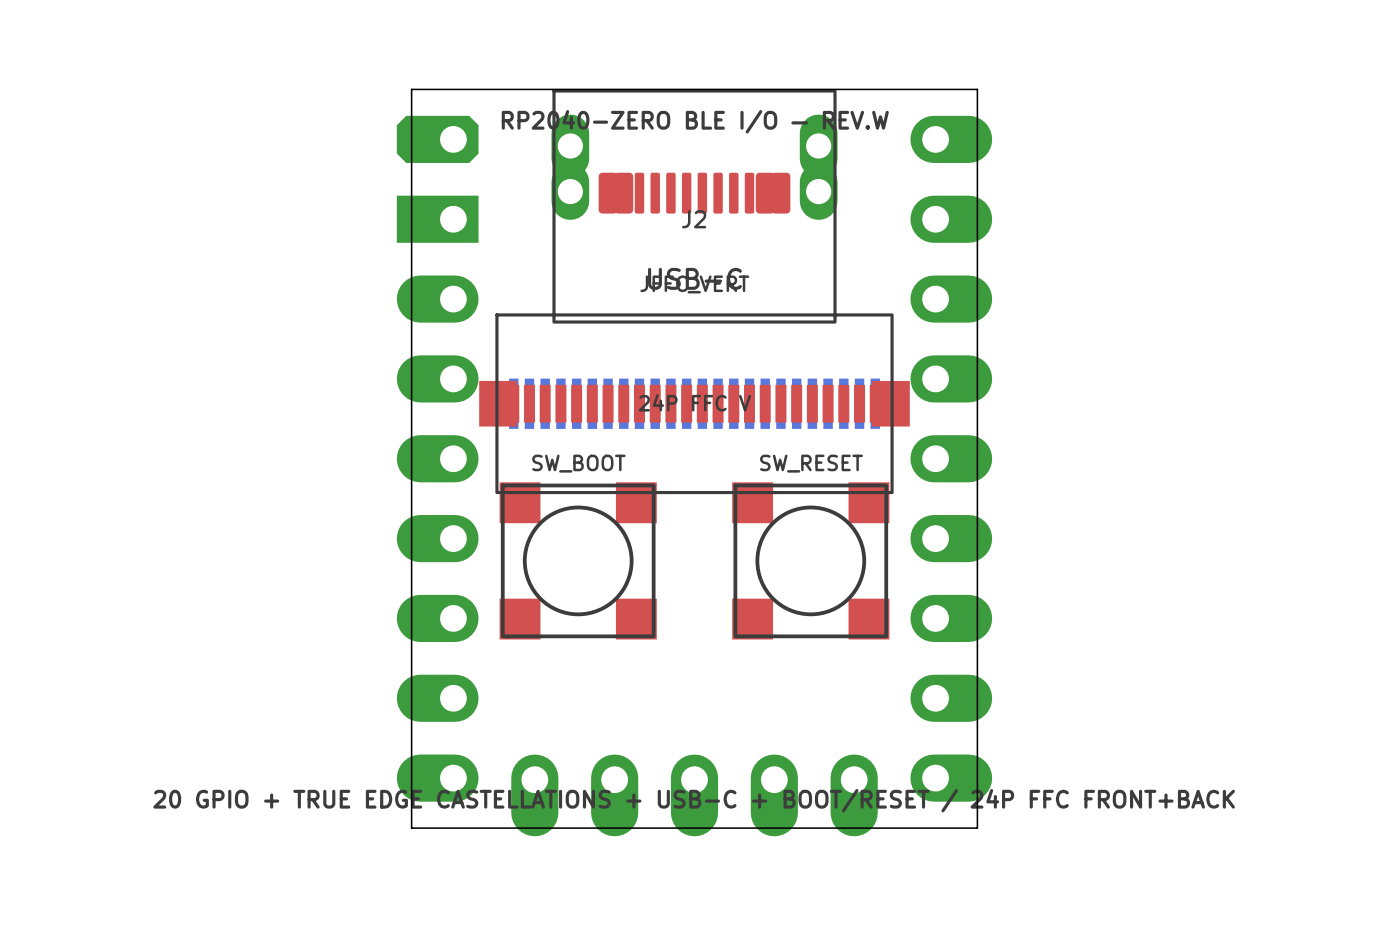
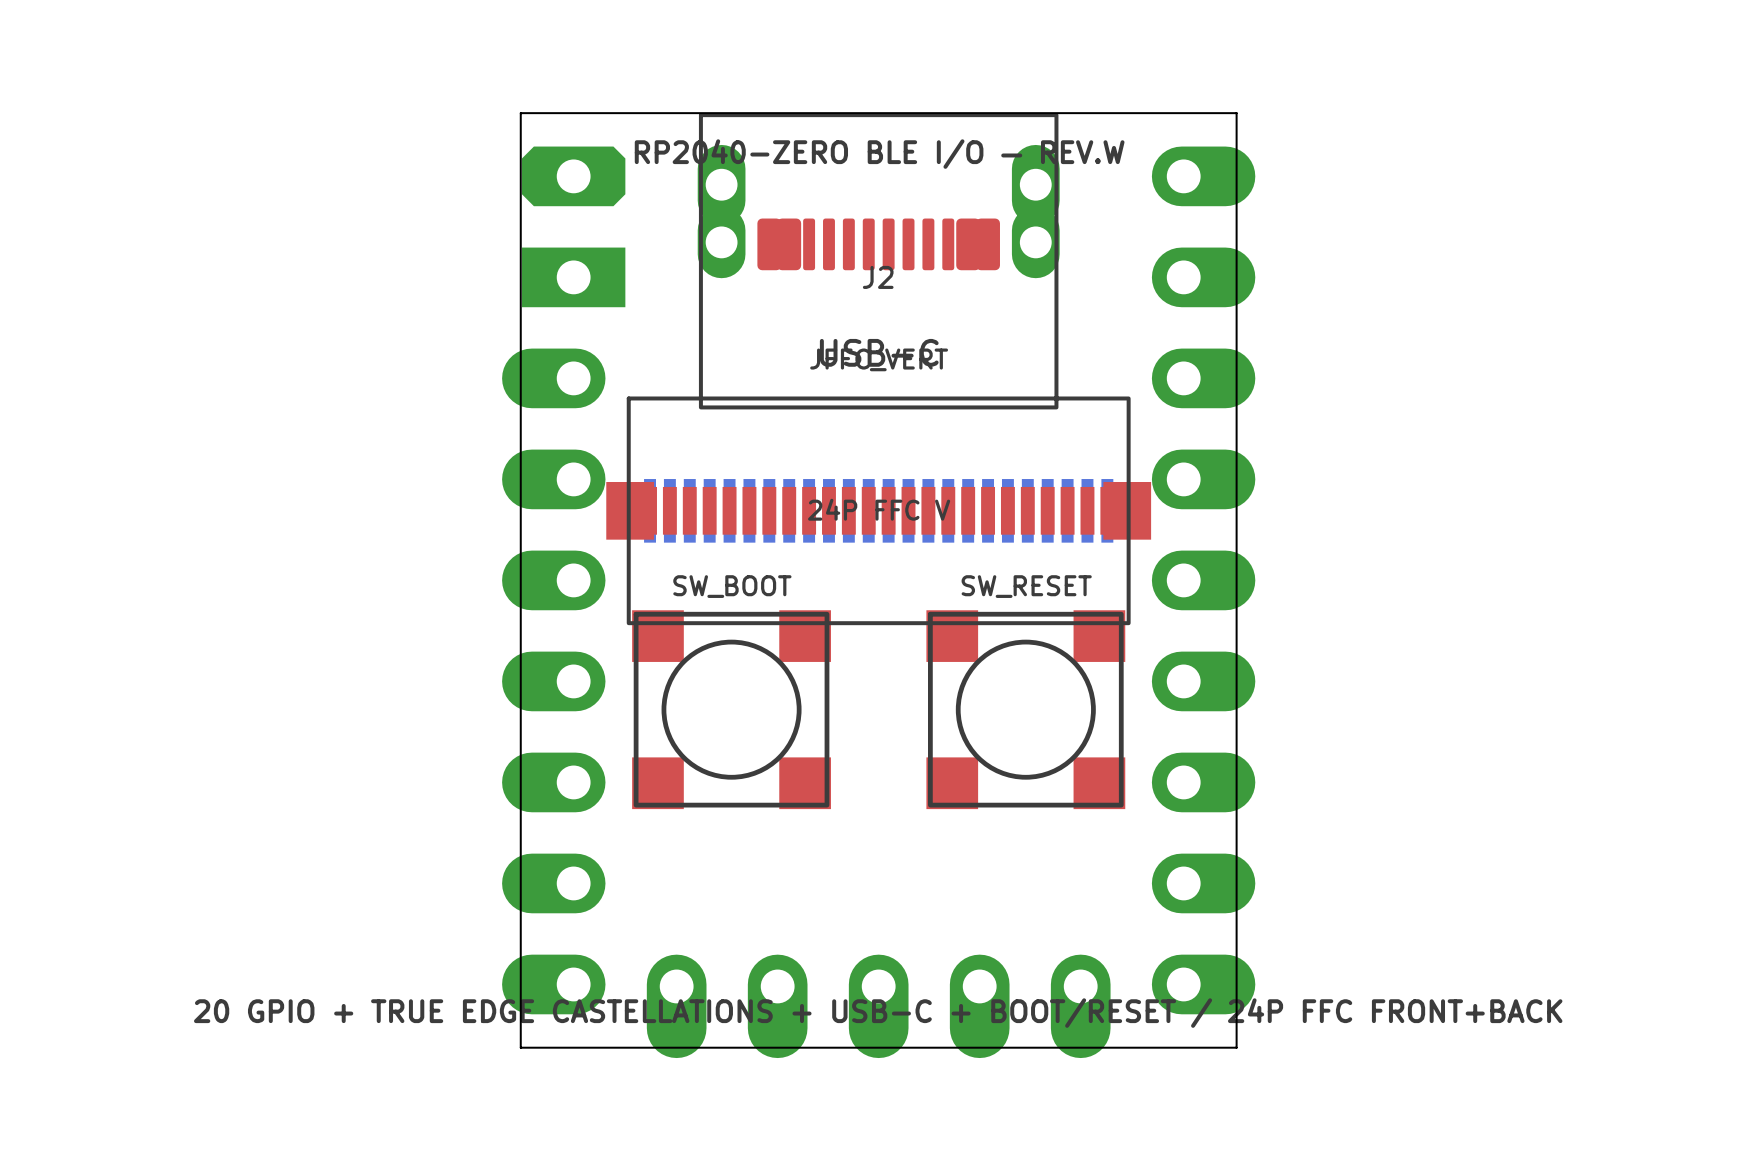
part footprint: [396, 115, 993, 837] -> [502, 146, 1256, 1059]

